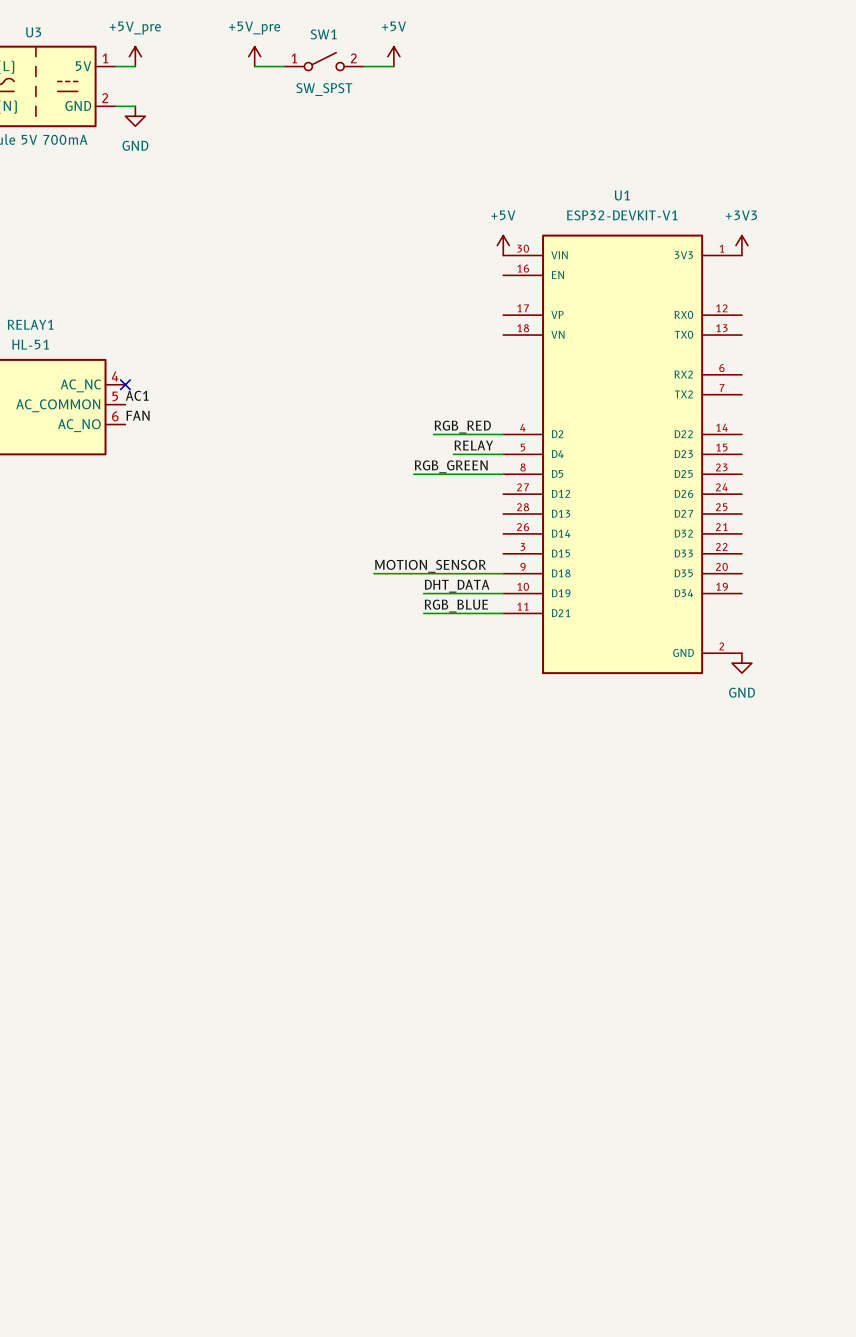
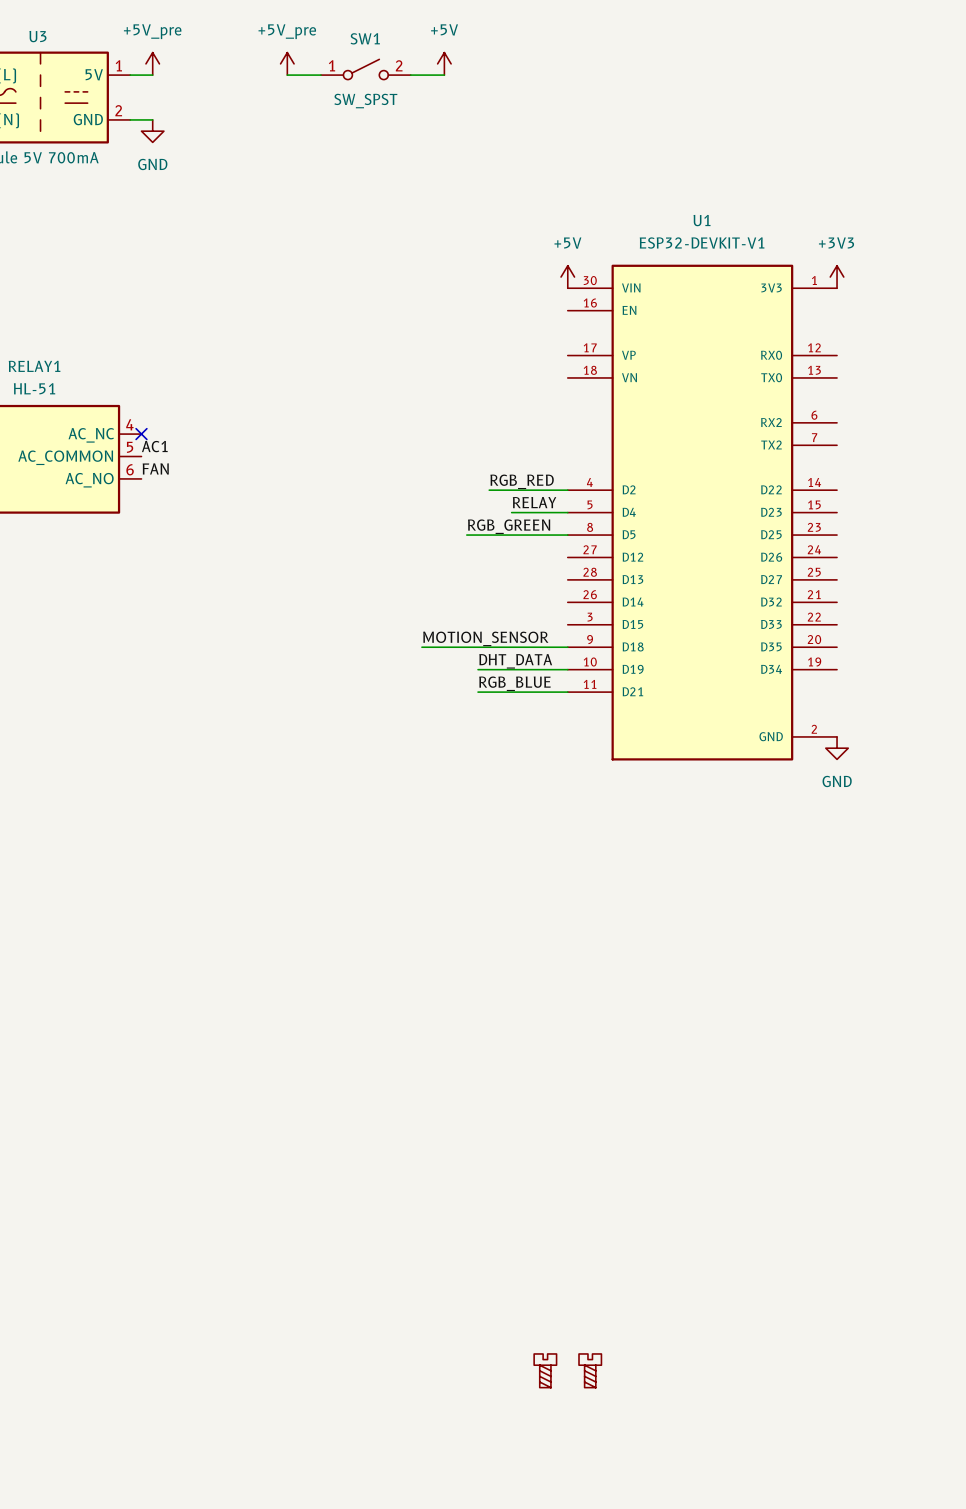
part: none -> (545, 1370)
part: none -> (590, 1370)

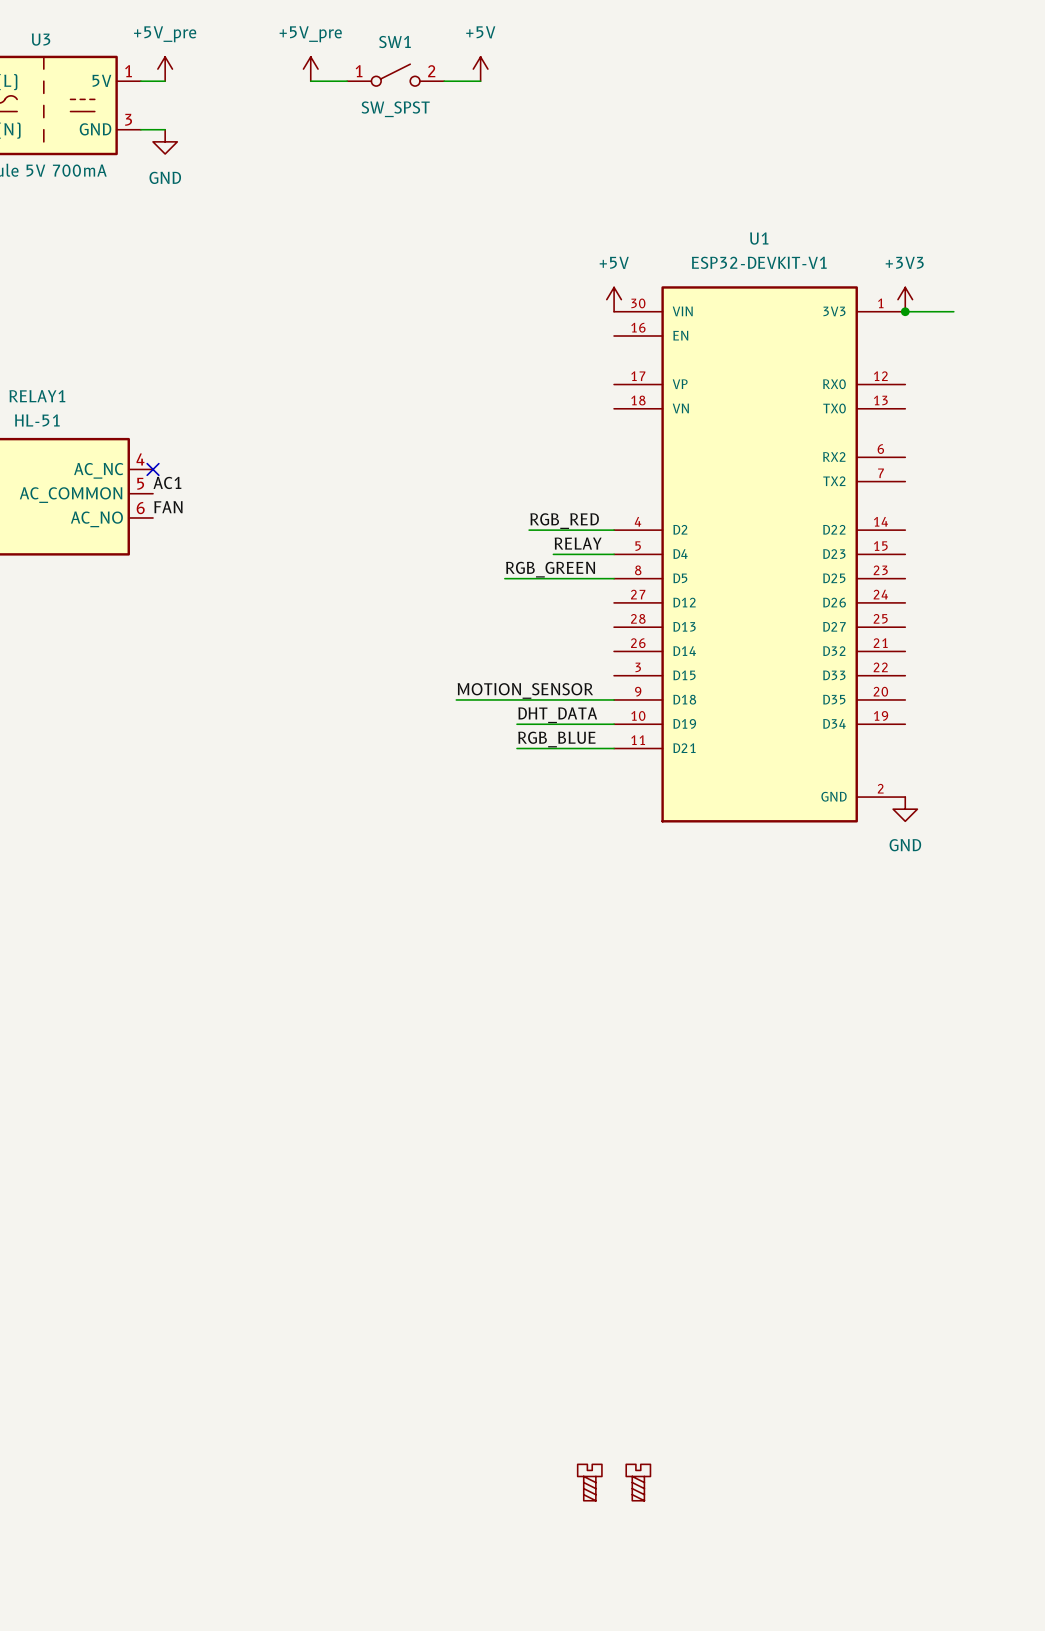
U3 pin number: 2 (118, 110) -> 3 (128, 119)
wire: none -> (905, 311) (953, 311)
junction: none -> (905, 311)

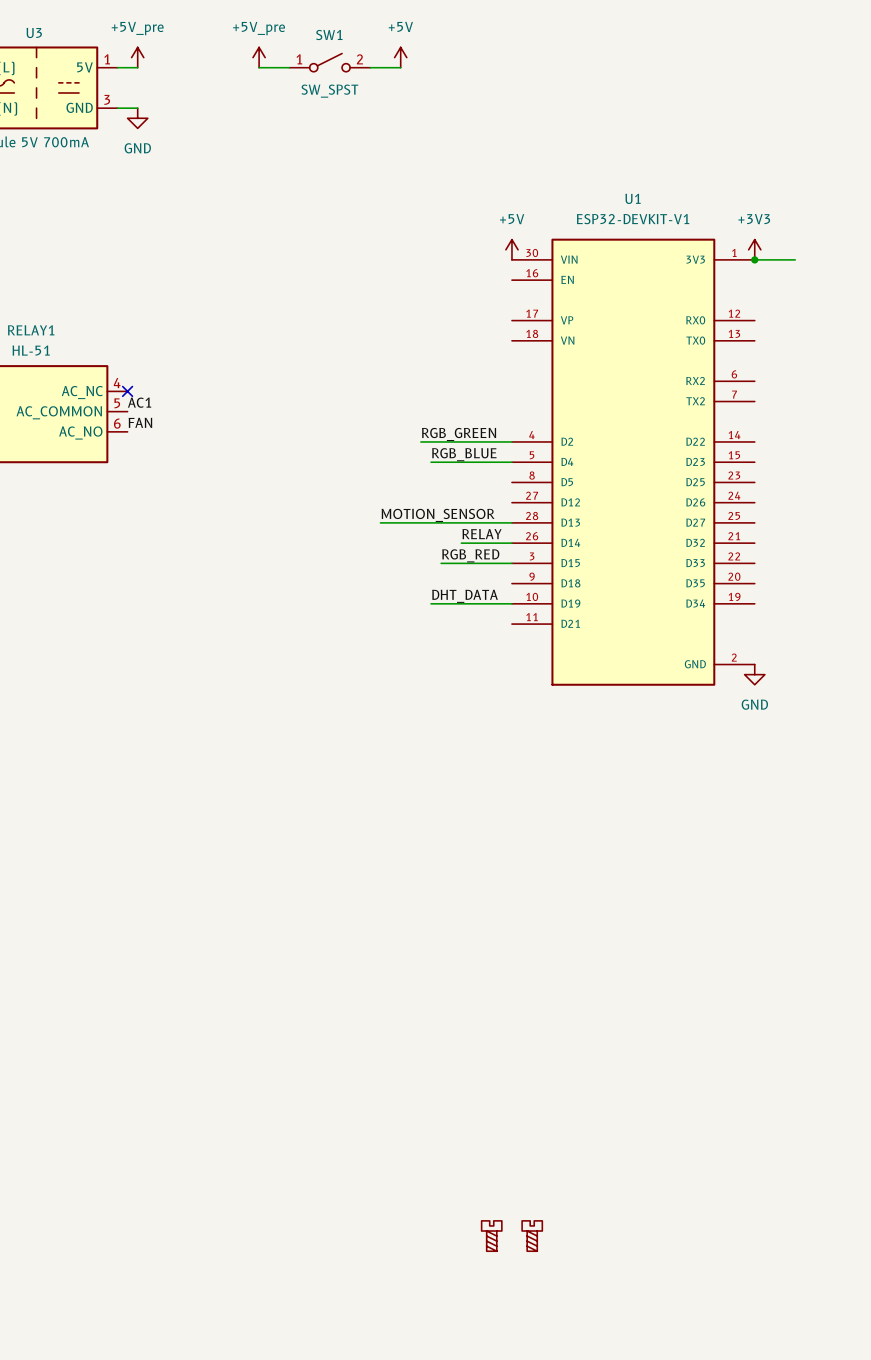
label position: RGB_RED (564, 521) -> RGB_RED (470, 555)
wire: none -> (420, 441) (441, 441)
label position: RELAY (578, 543) -> RELAY (482, 534)
wire: none -> (431, 462) (461, 462)
label position: RGB_GREEN (550, 569) -> RGB_GREEN (459, 434)
wire: (504, 578) (614, 578) -> none
wire: none -> (461, 543) (511, 543)
wire: none -> (441, 563) (511, 563)
label position: MOTION_SENSOR (525, 690) -> MOTION_SENSOR (438, 515)
wire: (456, 699) (614, 699) -> (380, 522) (511, 522)
label position: RGB_BLUE (556, 739) -> RGB_BLUE (464, 454)
wire: (517, 748) (614, 748) -> none

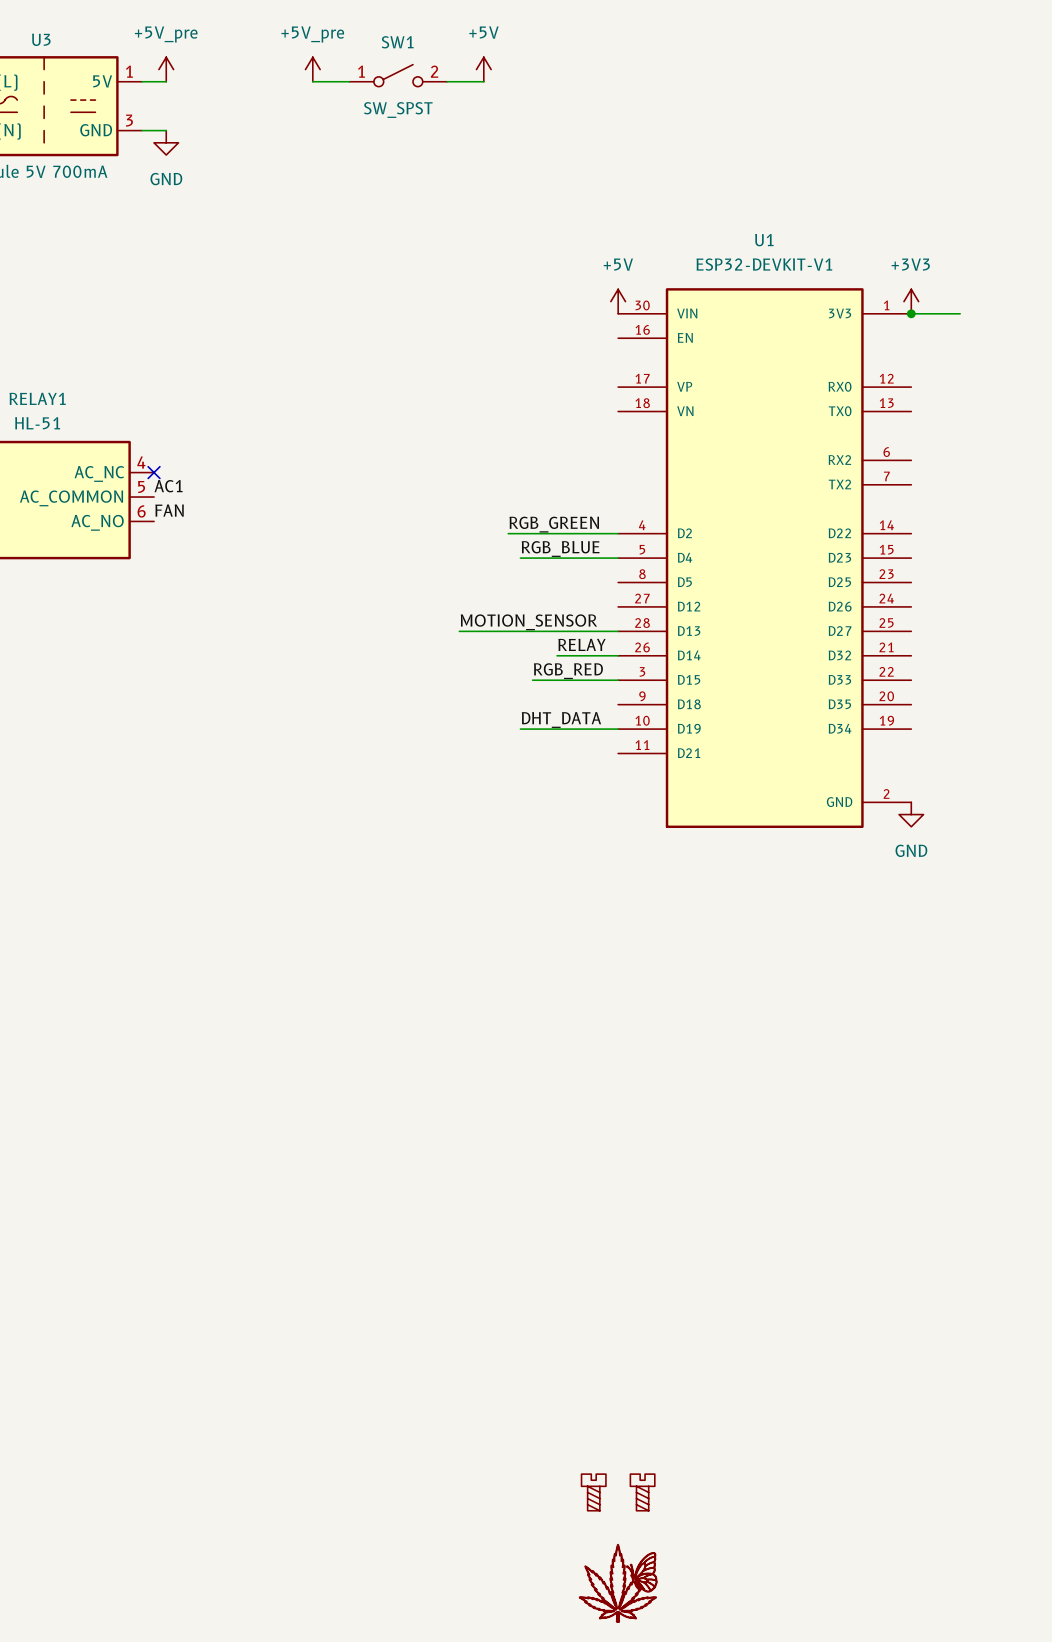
part: none -> (618, 1583)

